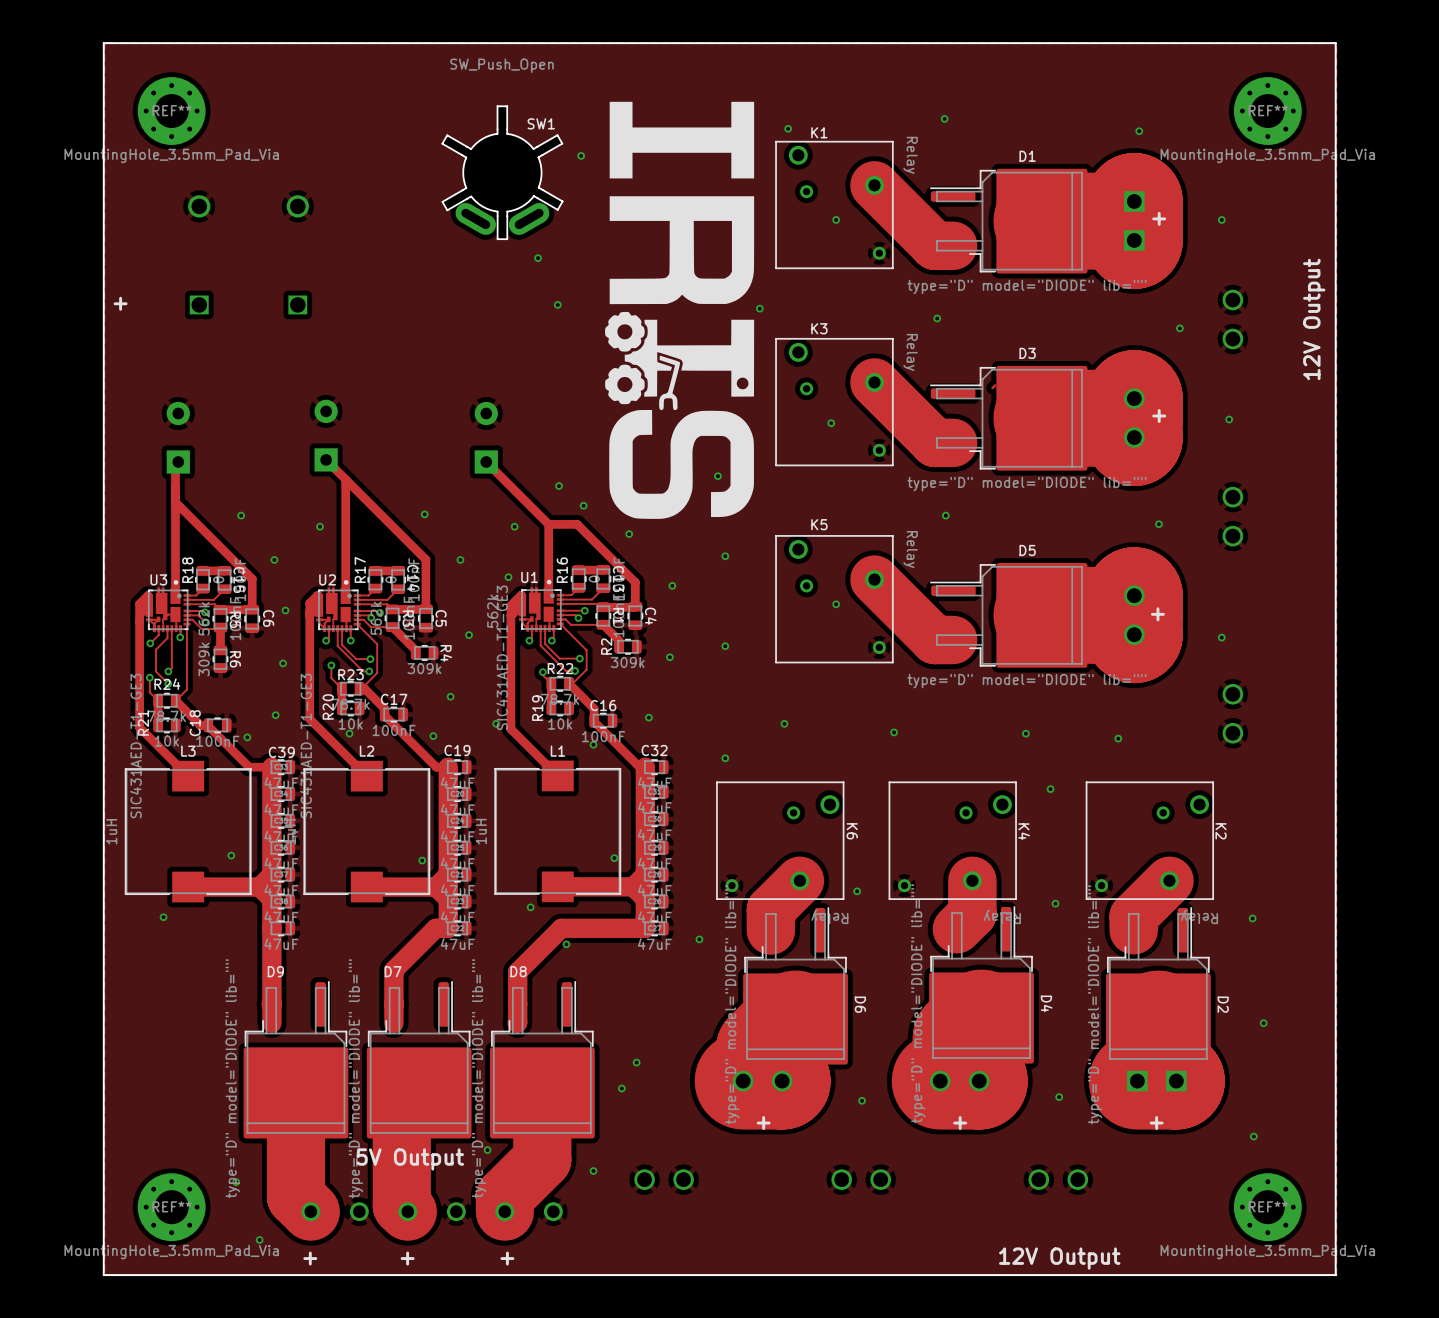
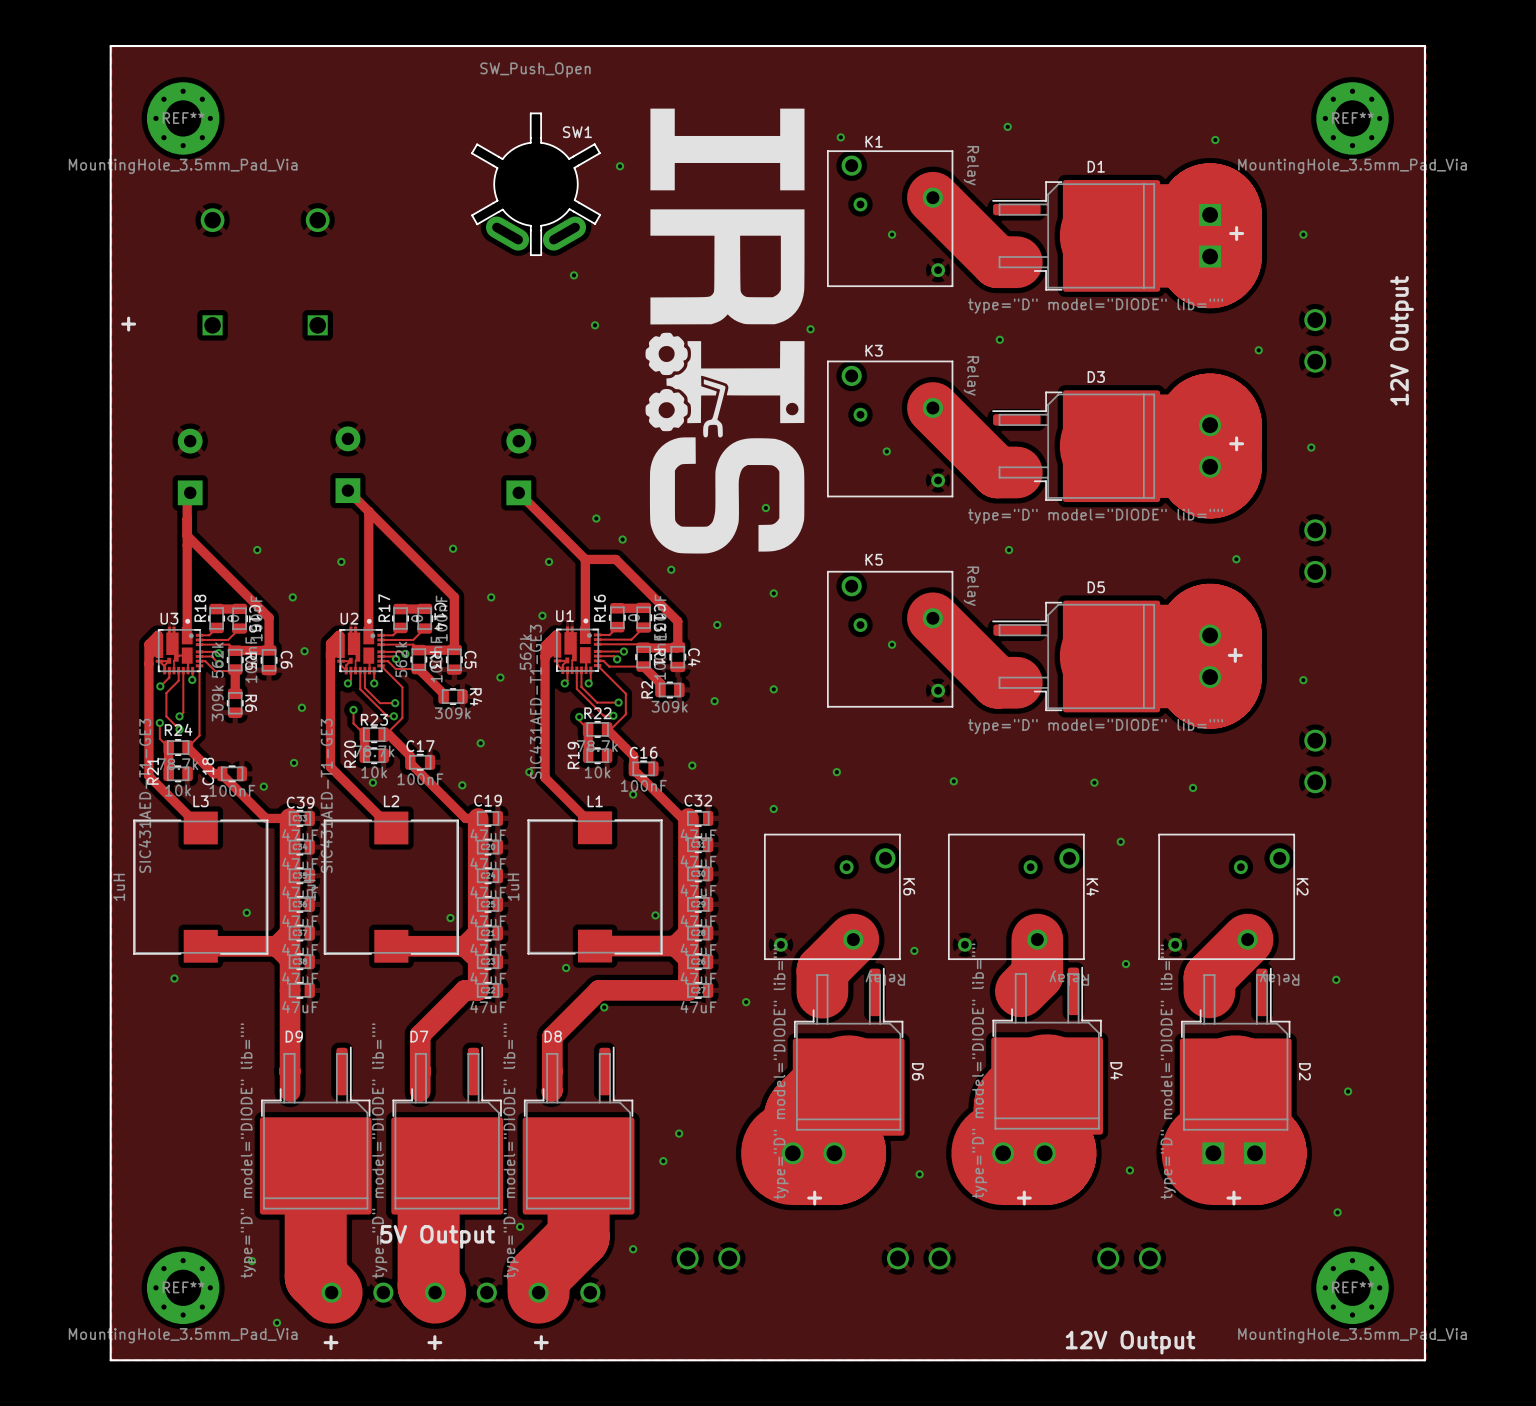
track: (995, 385) (992, 388) -> none

